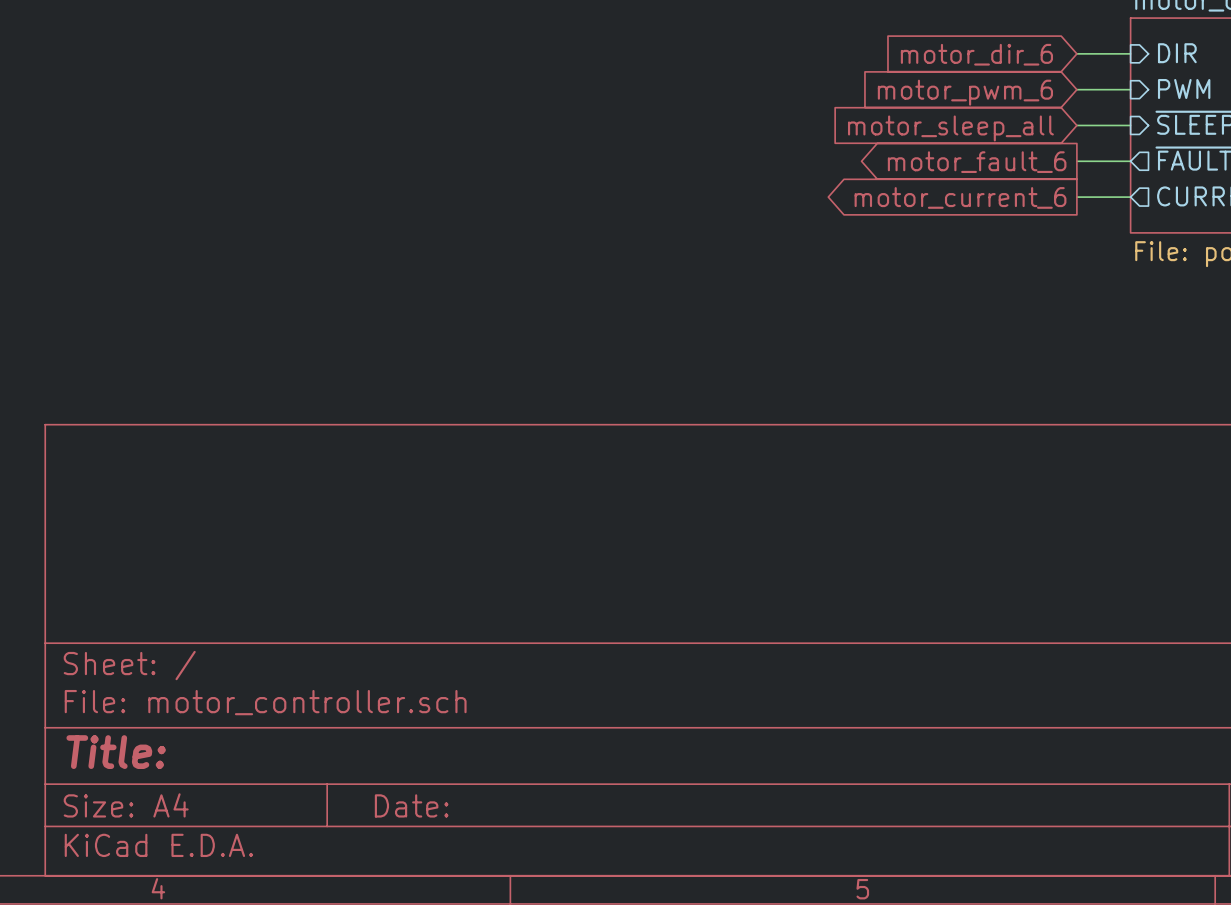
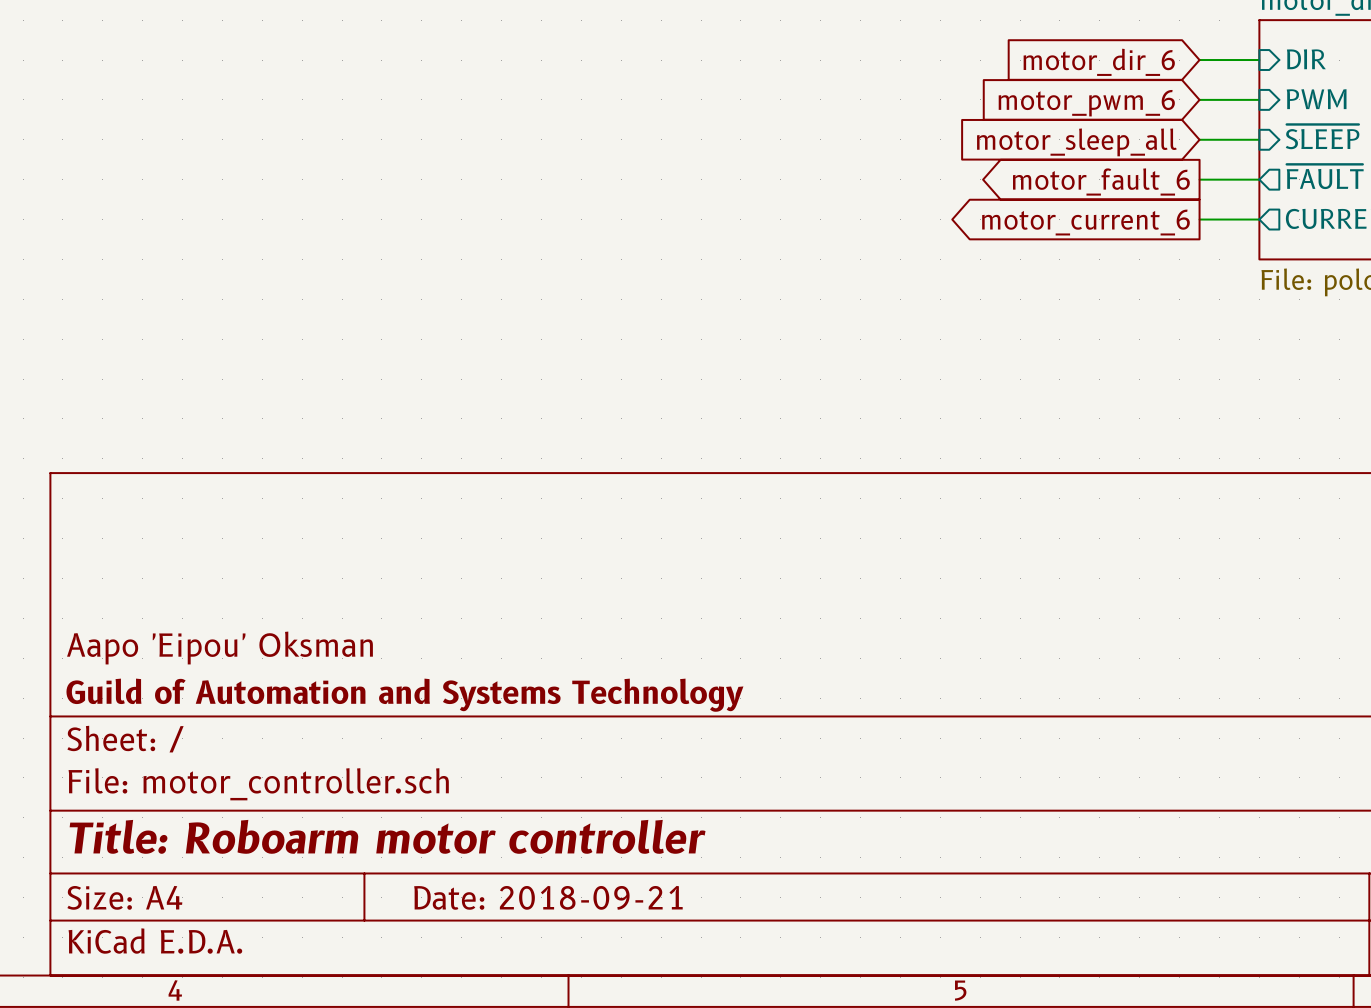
title block: none -> Aapo 'Eipou' Oksman (219, 648)
title block: none -> Guild of Automation and Systems Technology (404, 695)
title block: Title: (116, 752) -> Title: Roboarm motor controller (387, 836)
title block: Date: (411, 805) -> Date: 2018-09-21 (548, 897)

